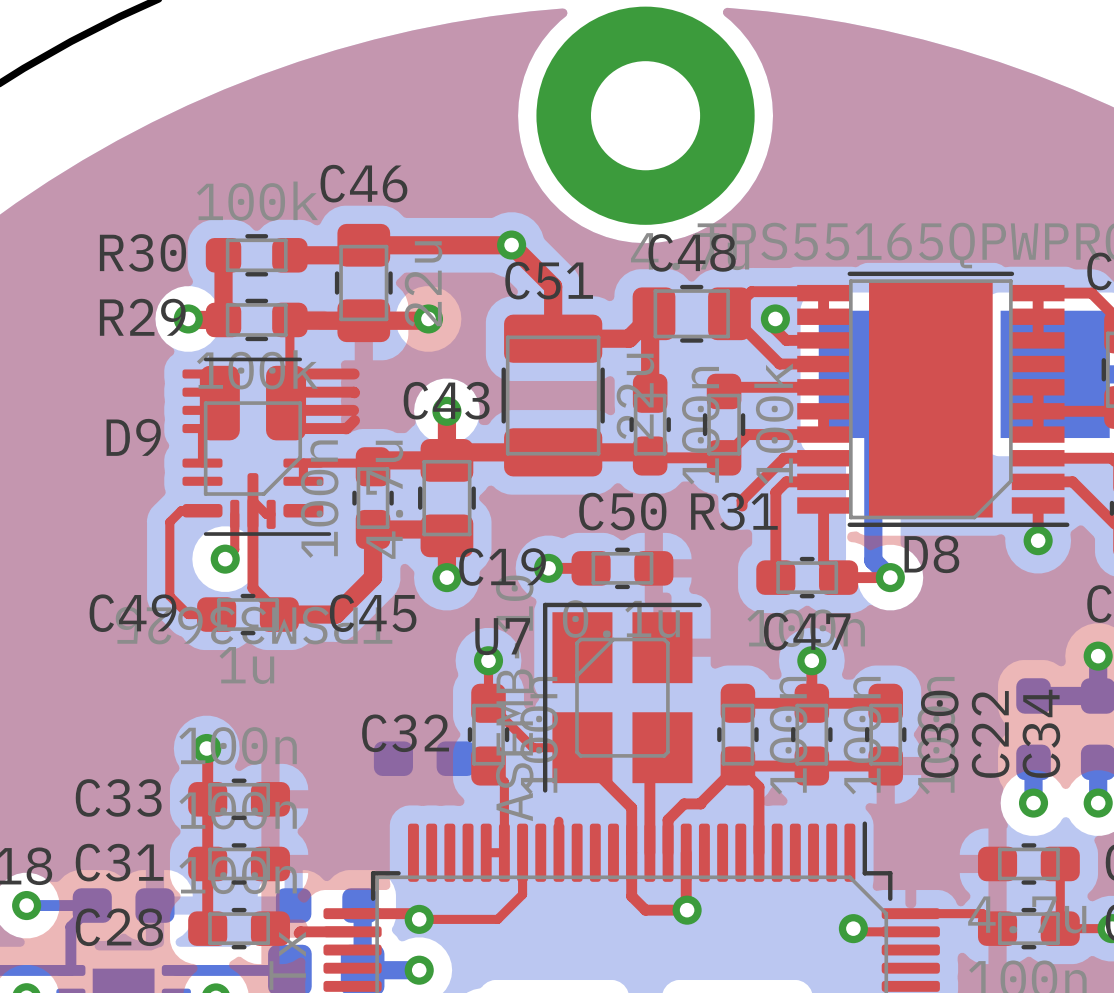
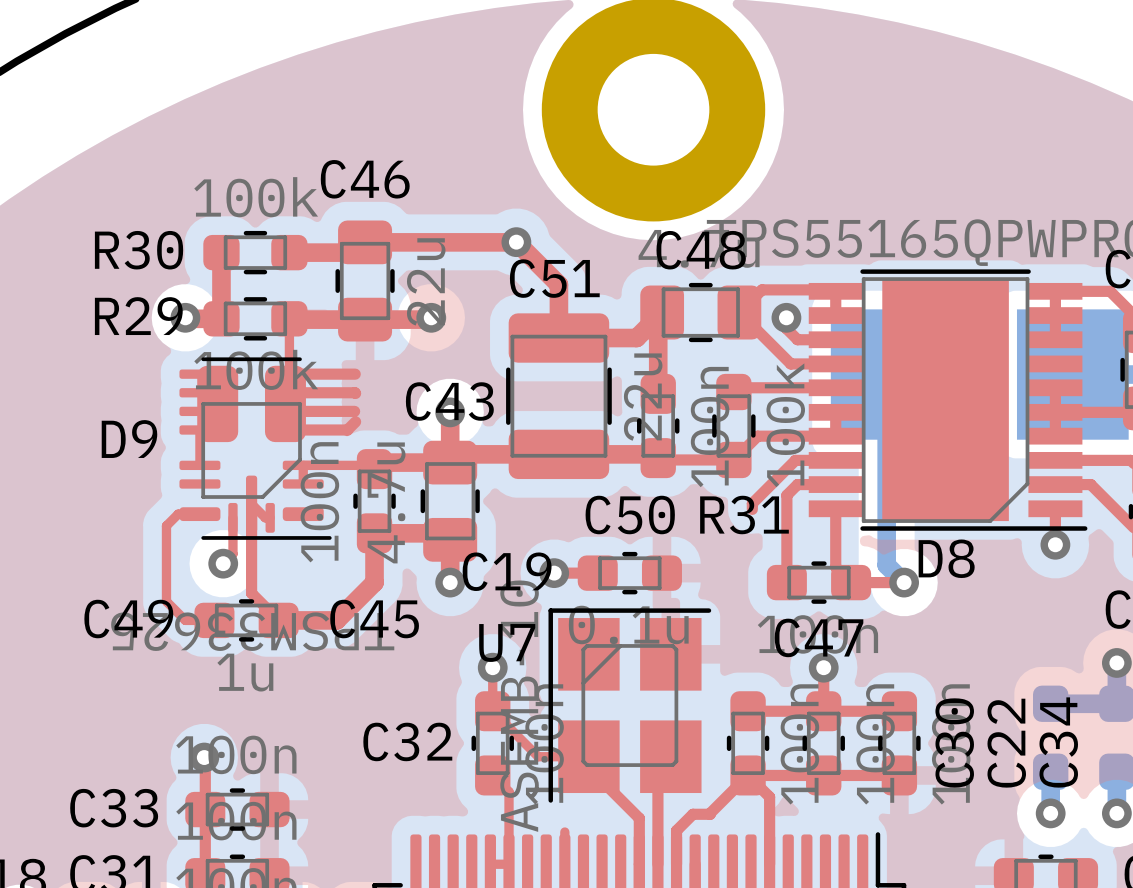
part: (424, 758) -> none

